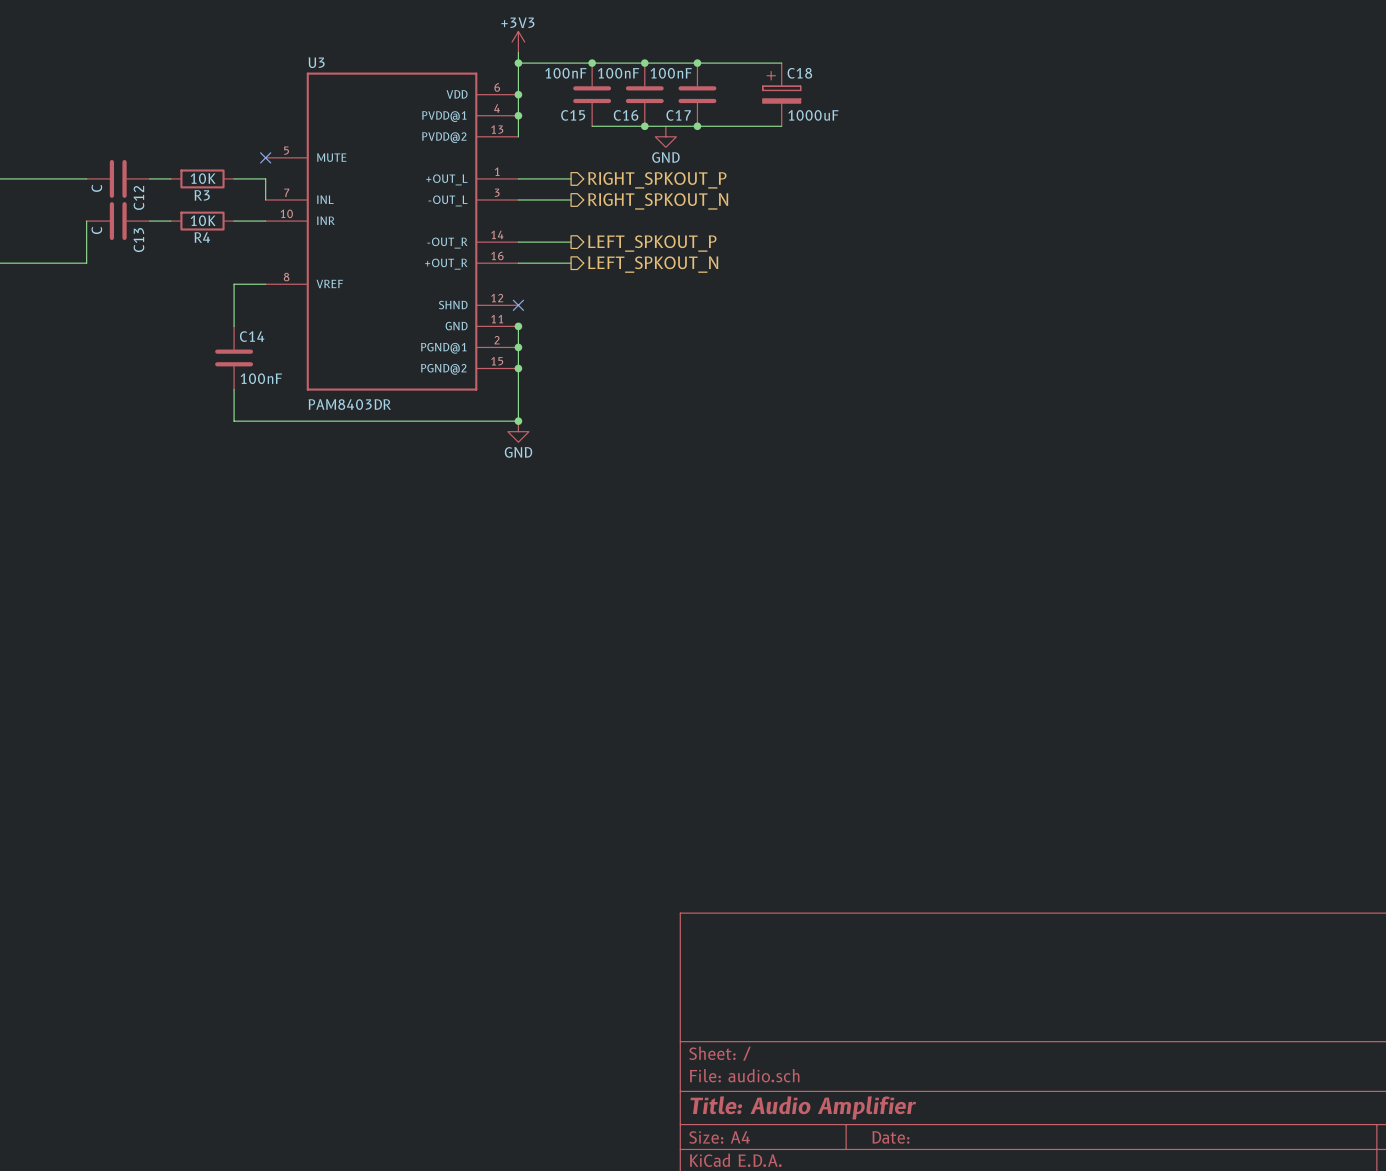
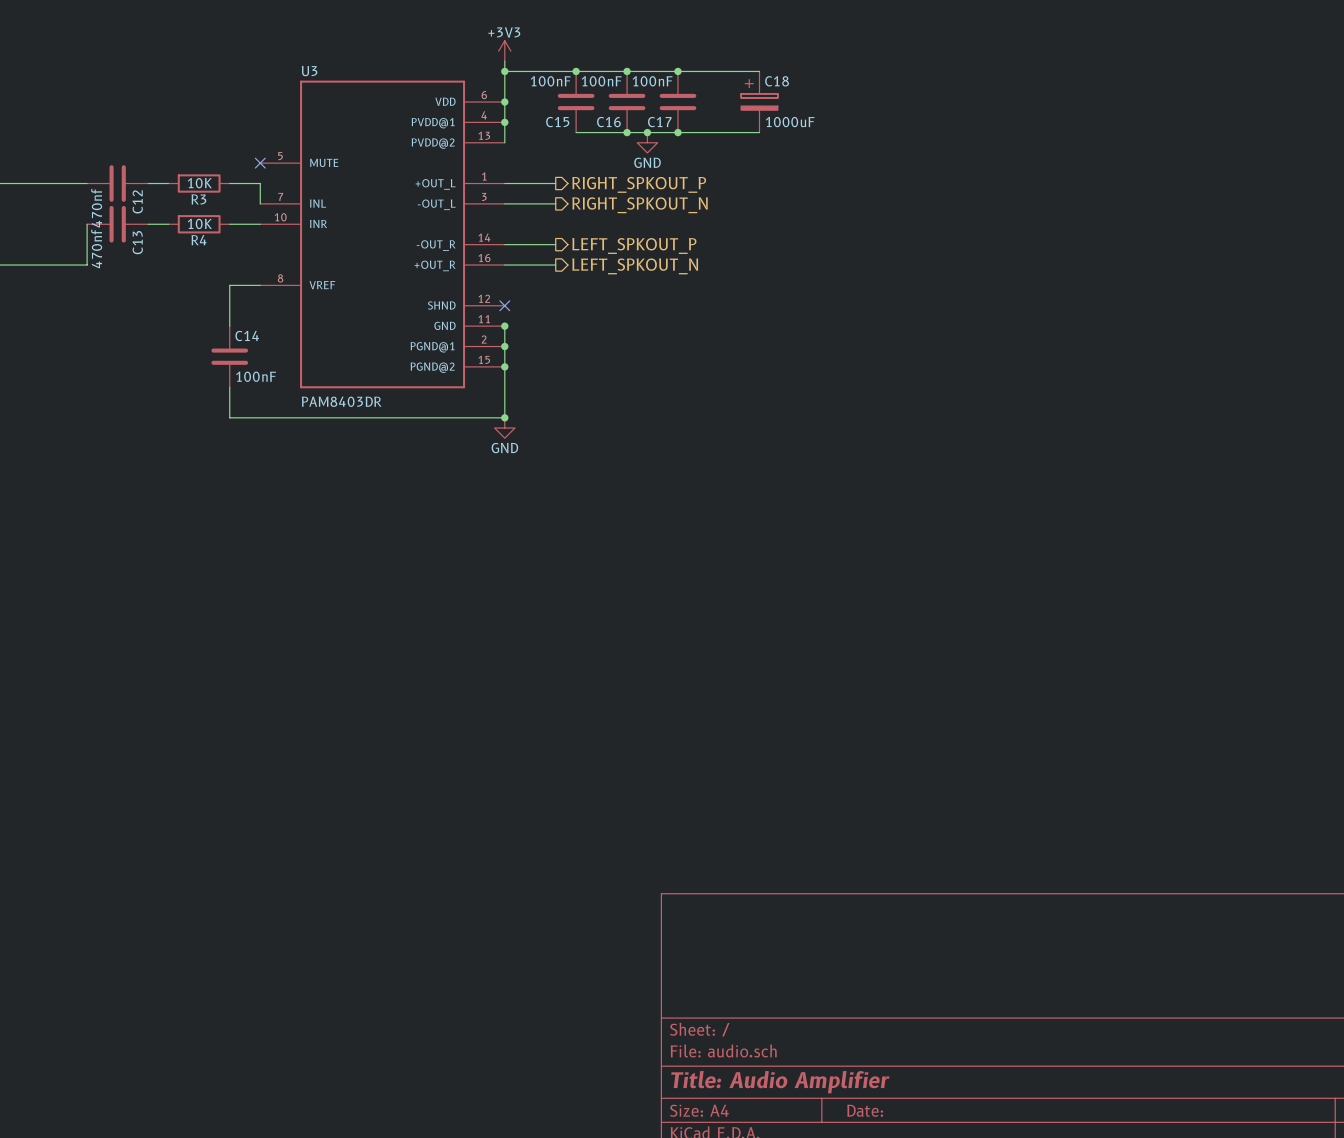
junction: none -> (647, 132)
C12 value: C (96, 188) -> 470nf (96, 208)
C13 value: C (96, 230) -> 470nf (96, 248)

